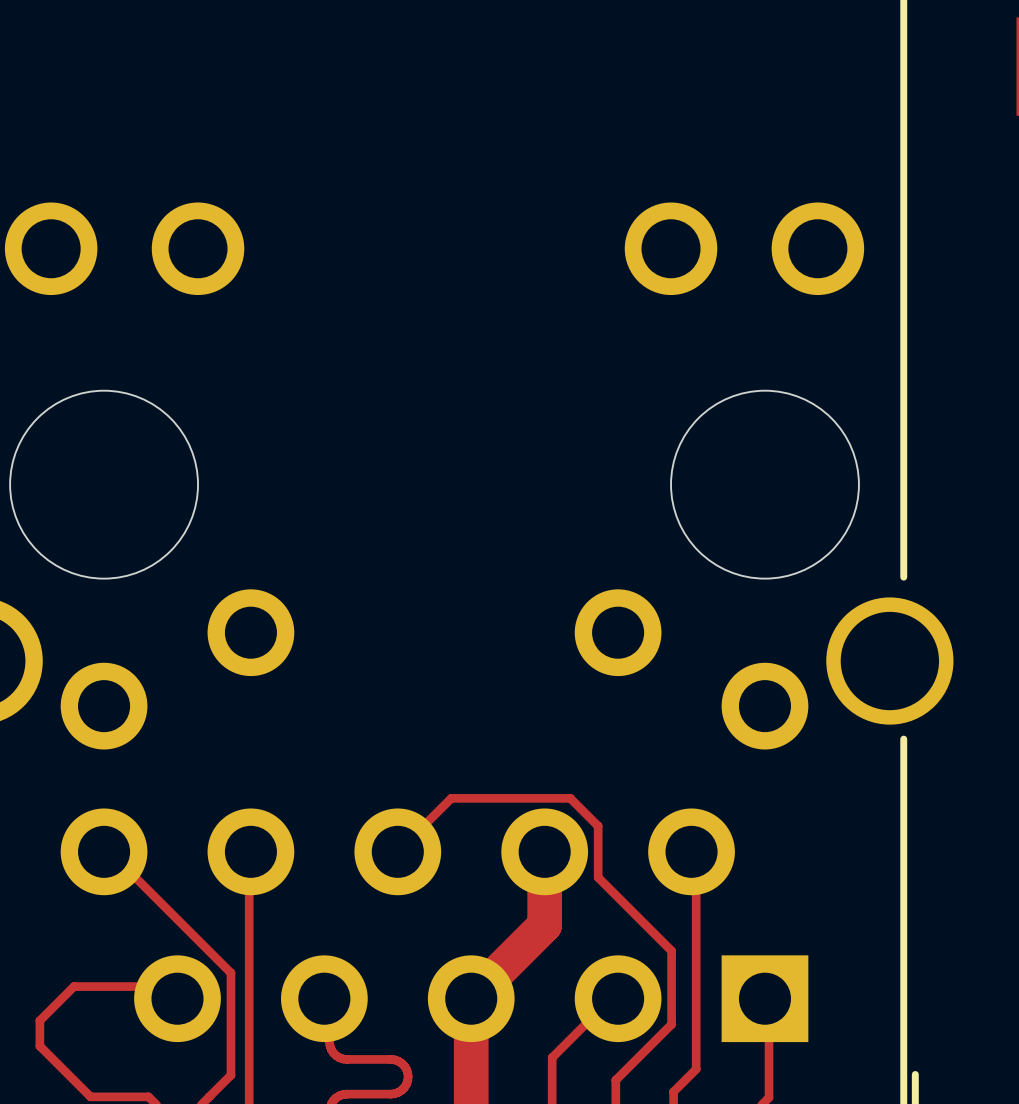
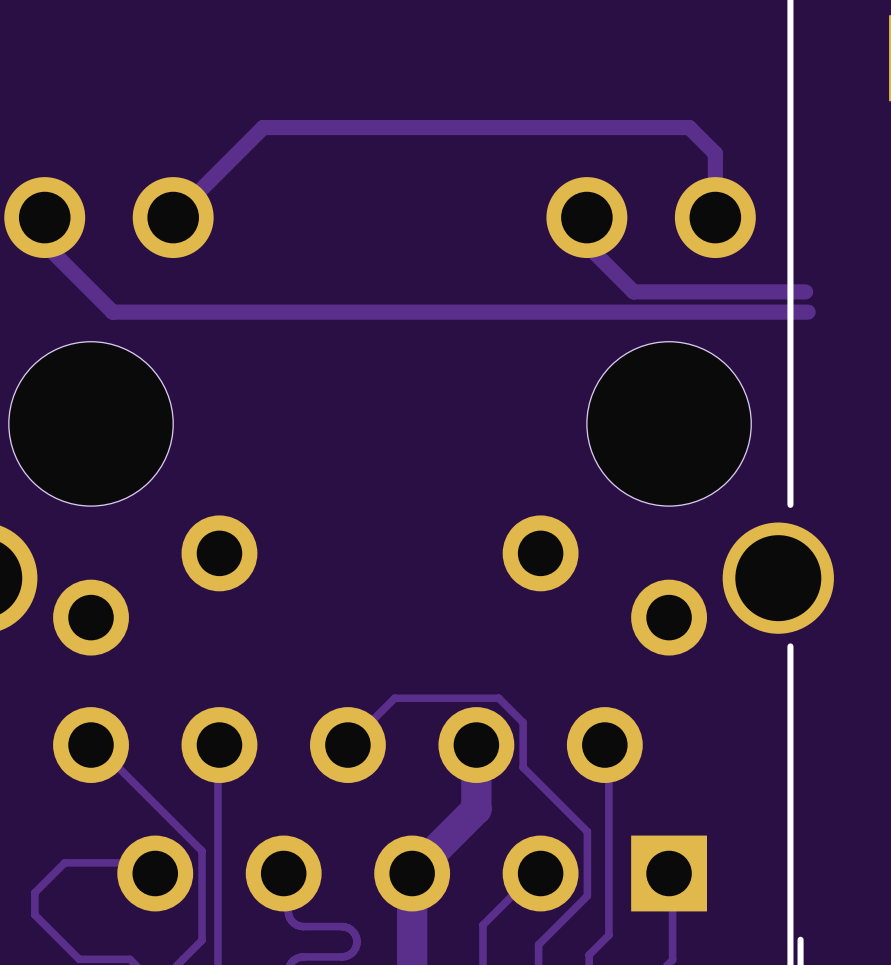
track: none -> (44, 217) (44, 244) (112, 312) (808, 312)
track: none -> (173, 217) (263, 127) (689, 127) (715, 153) (715, 217)
track: none -> (586, 217) (586, 245) (633, 291) (805, 291)

